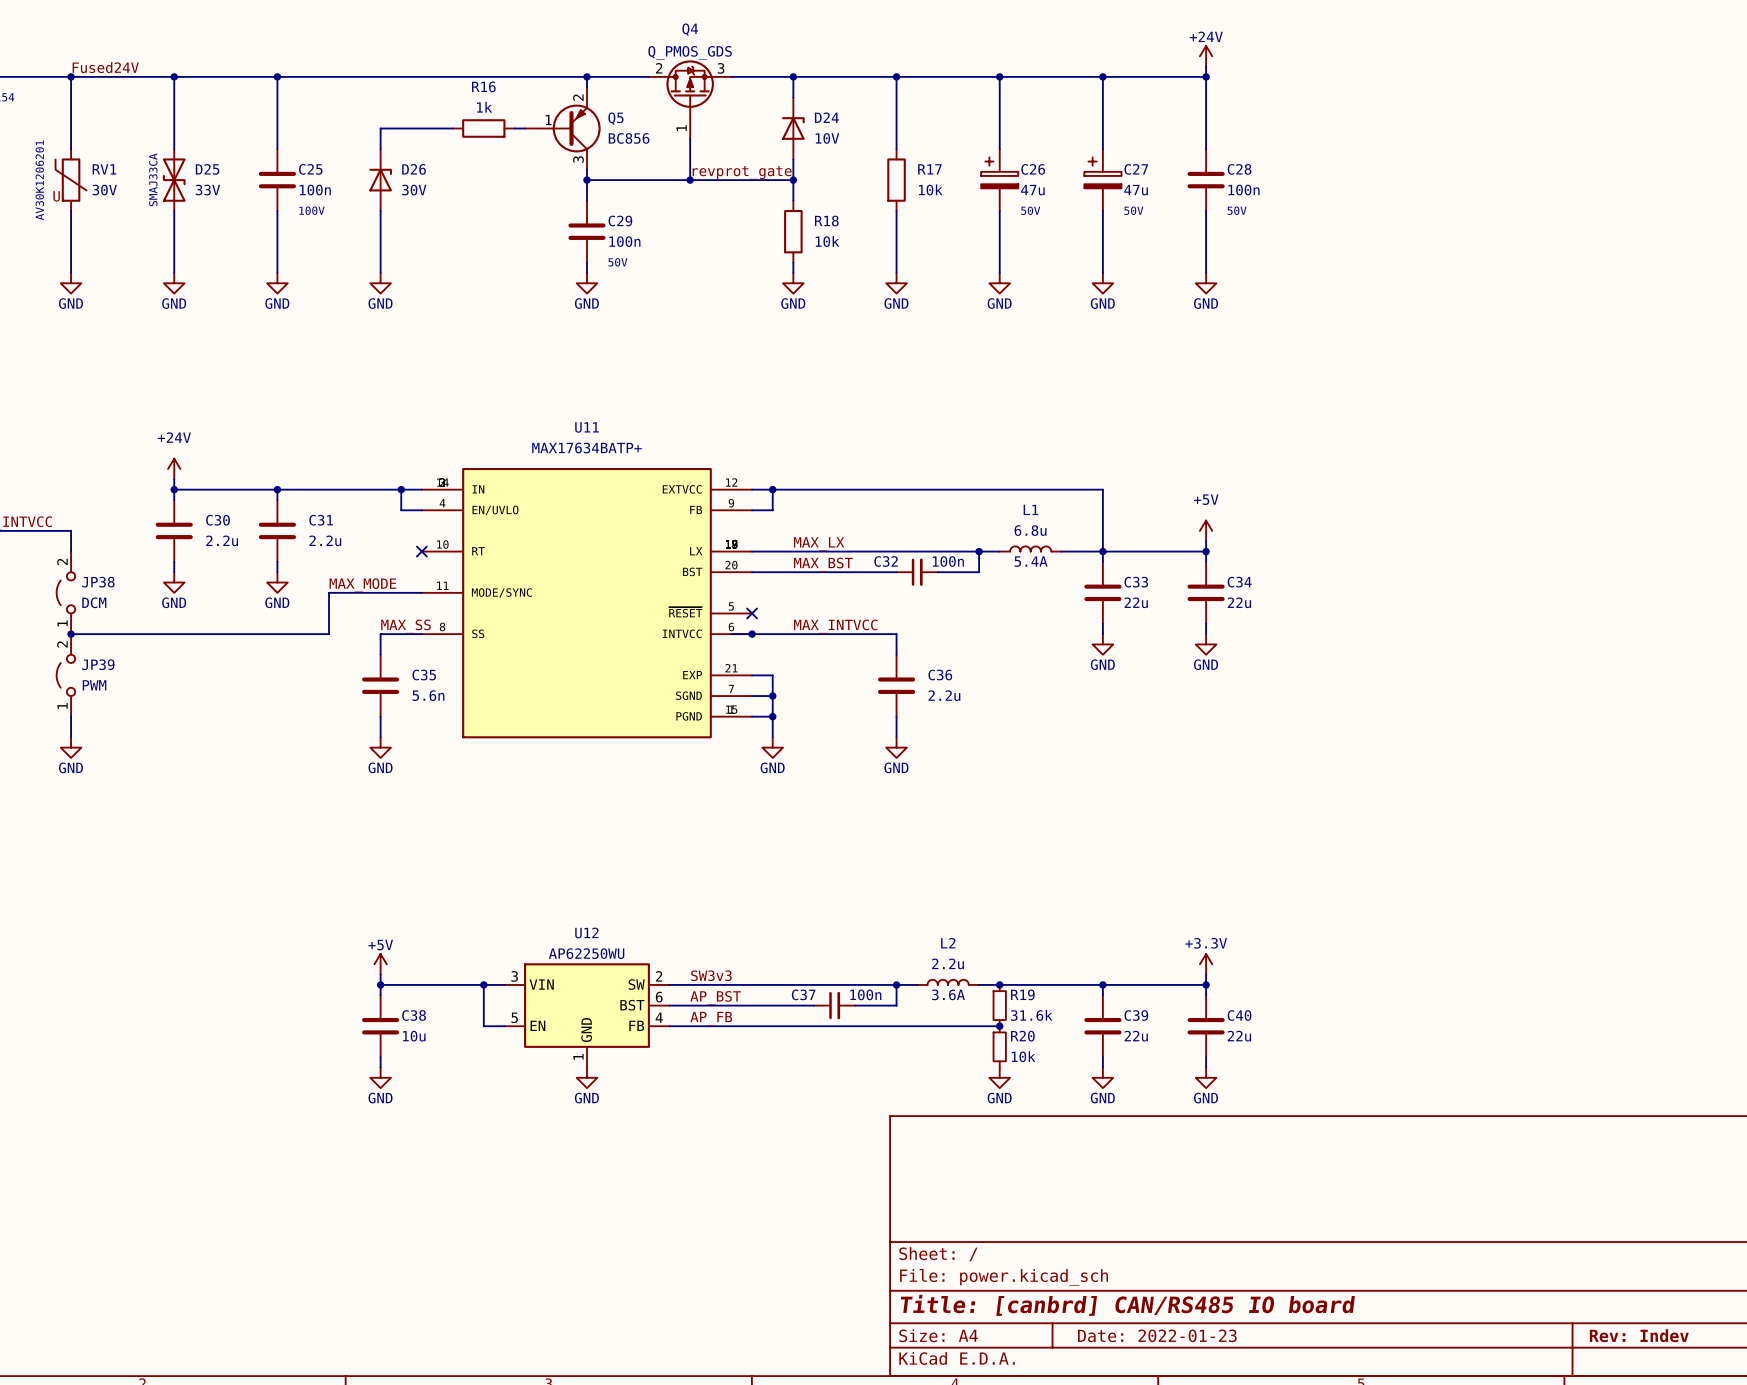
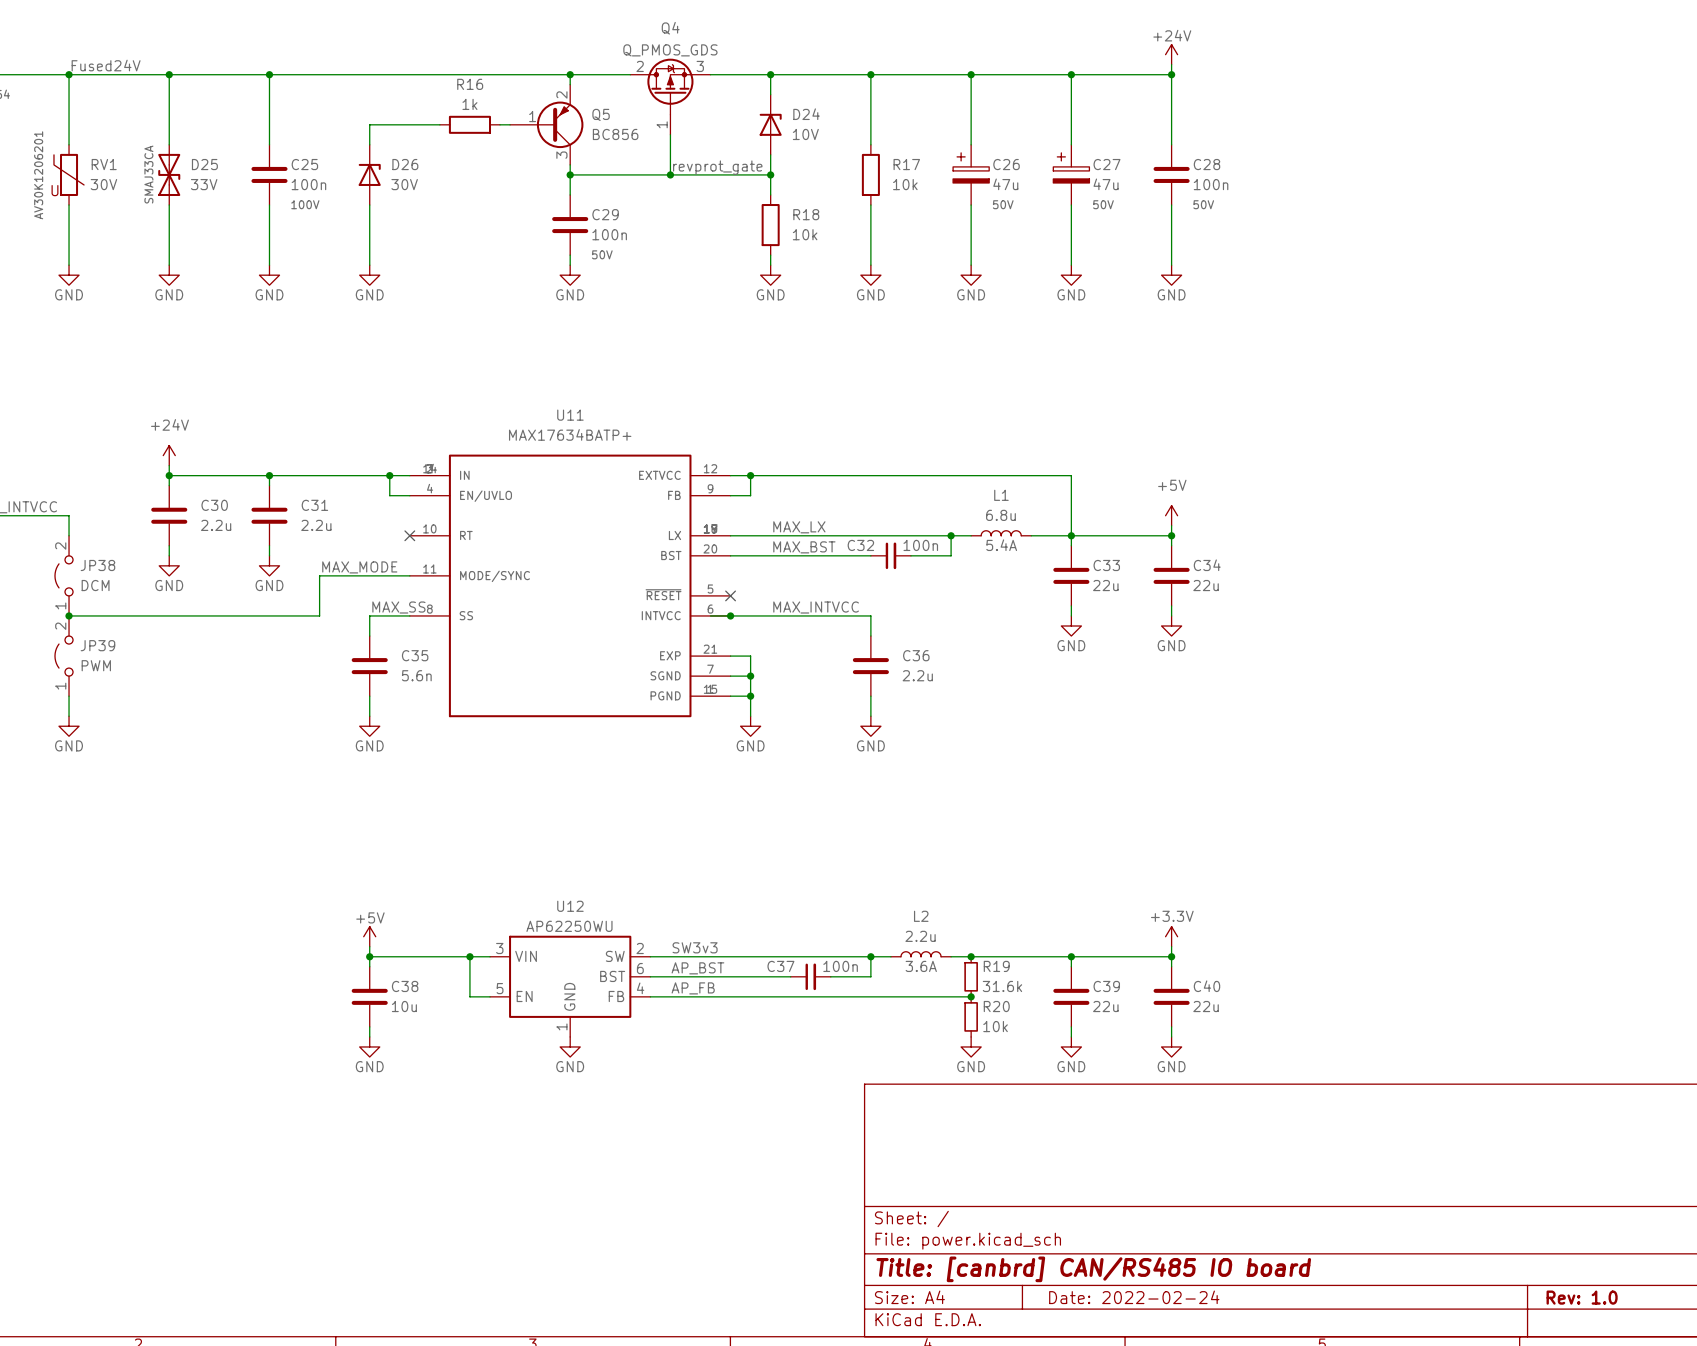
title block: Date: 2022-01-23 (1157, 1335) -> Date: 2022-02-24 (1134, 1297)
title block: Rev: Indev (1639, 1335) -> Rev: 1.0 (1582, 1297)

